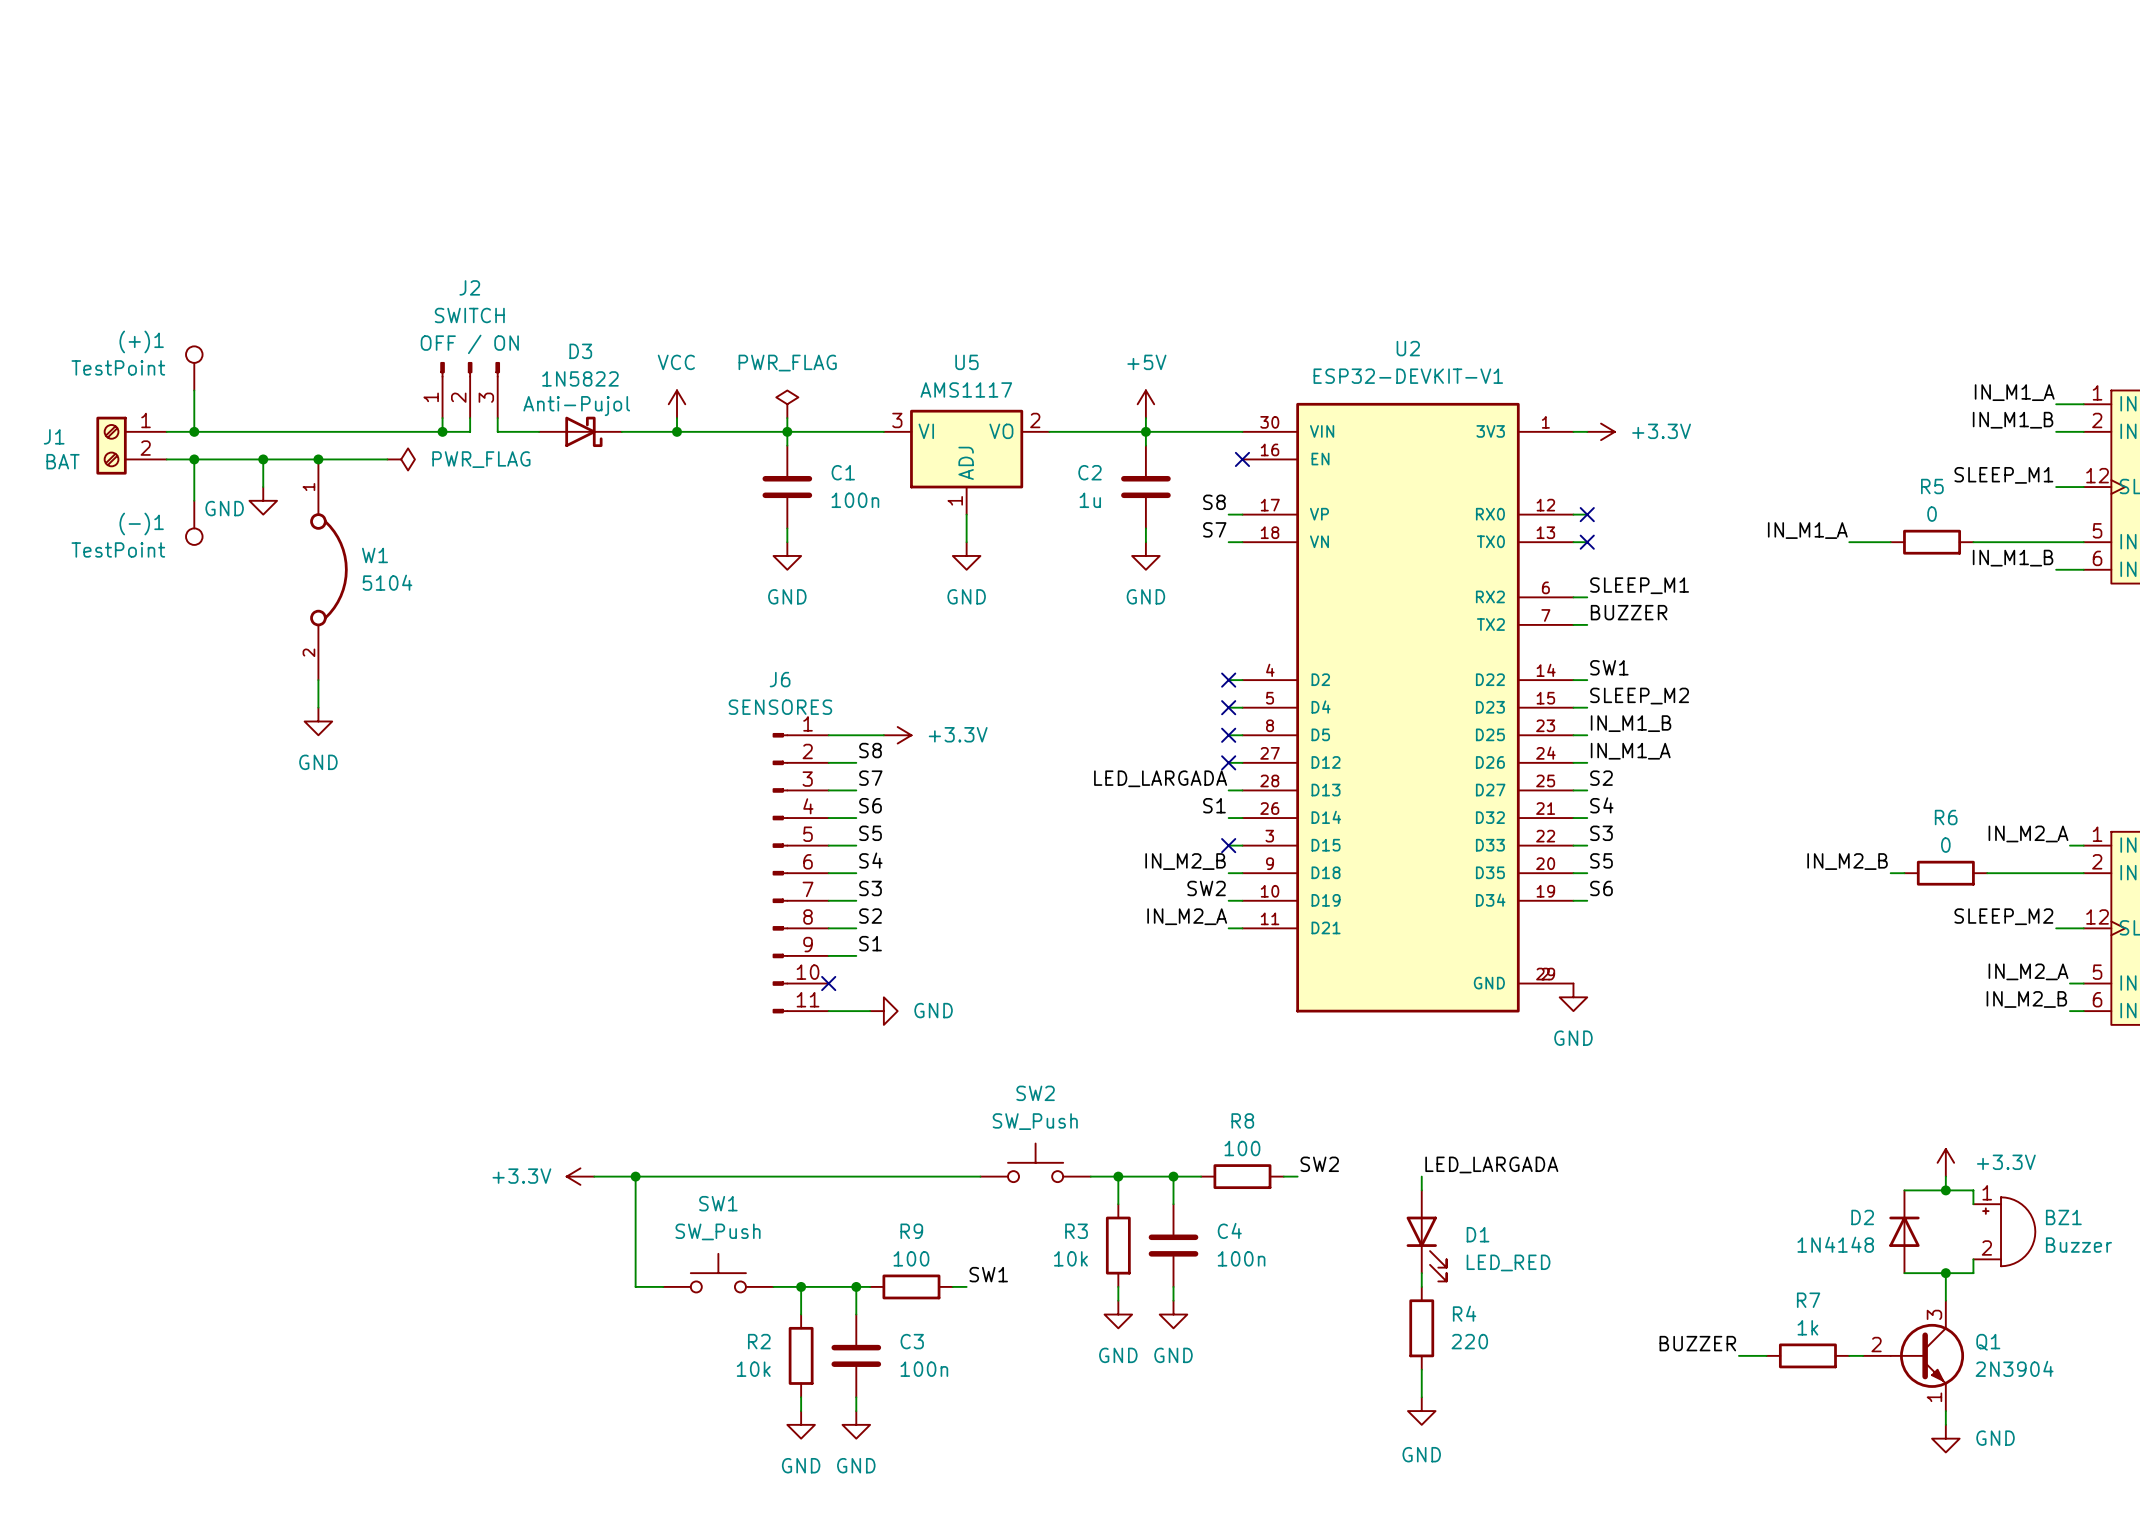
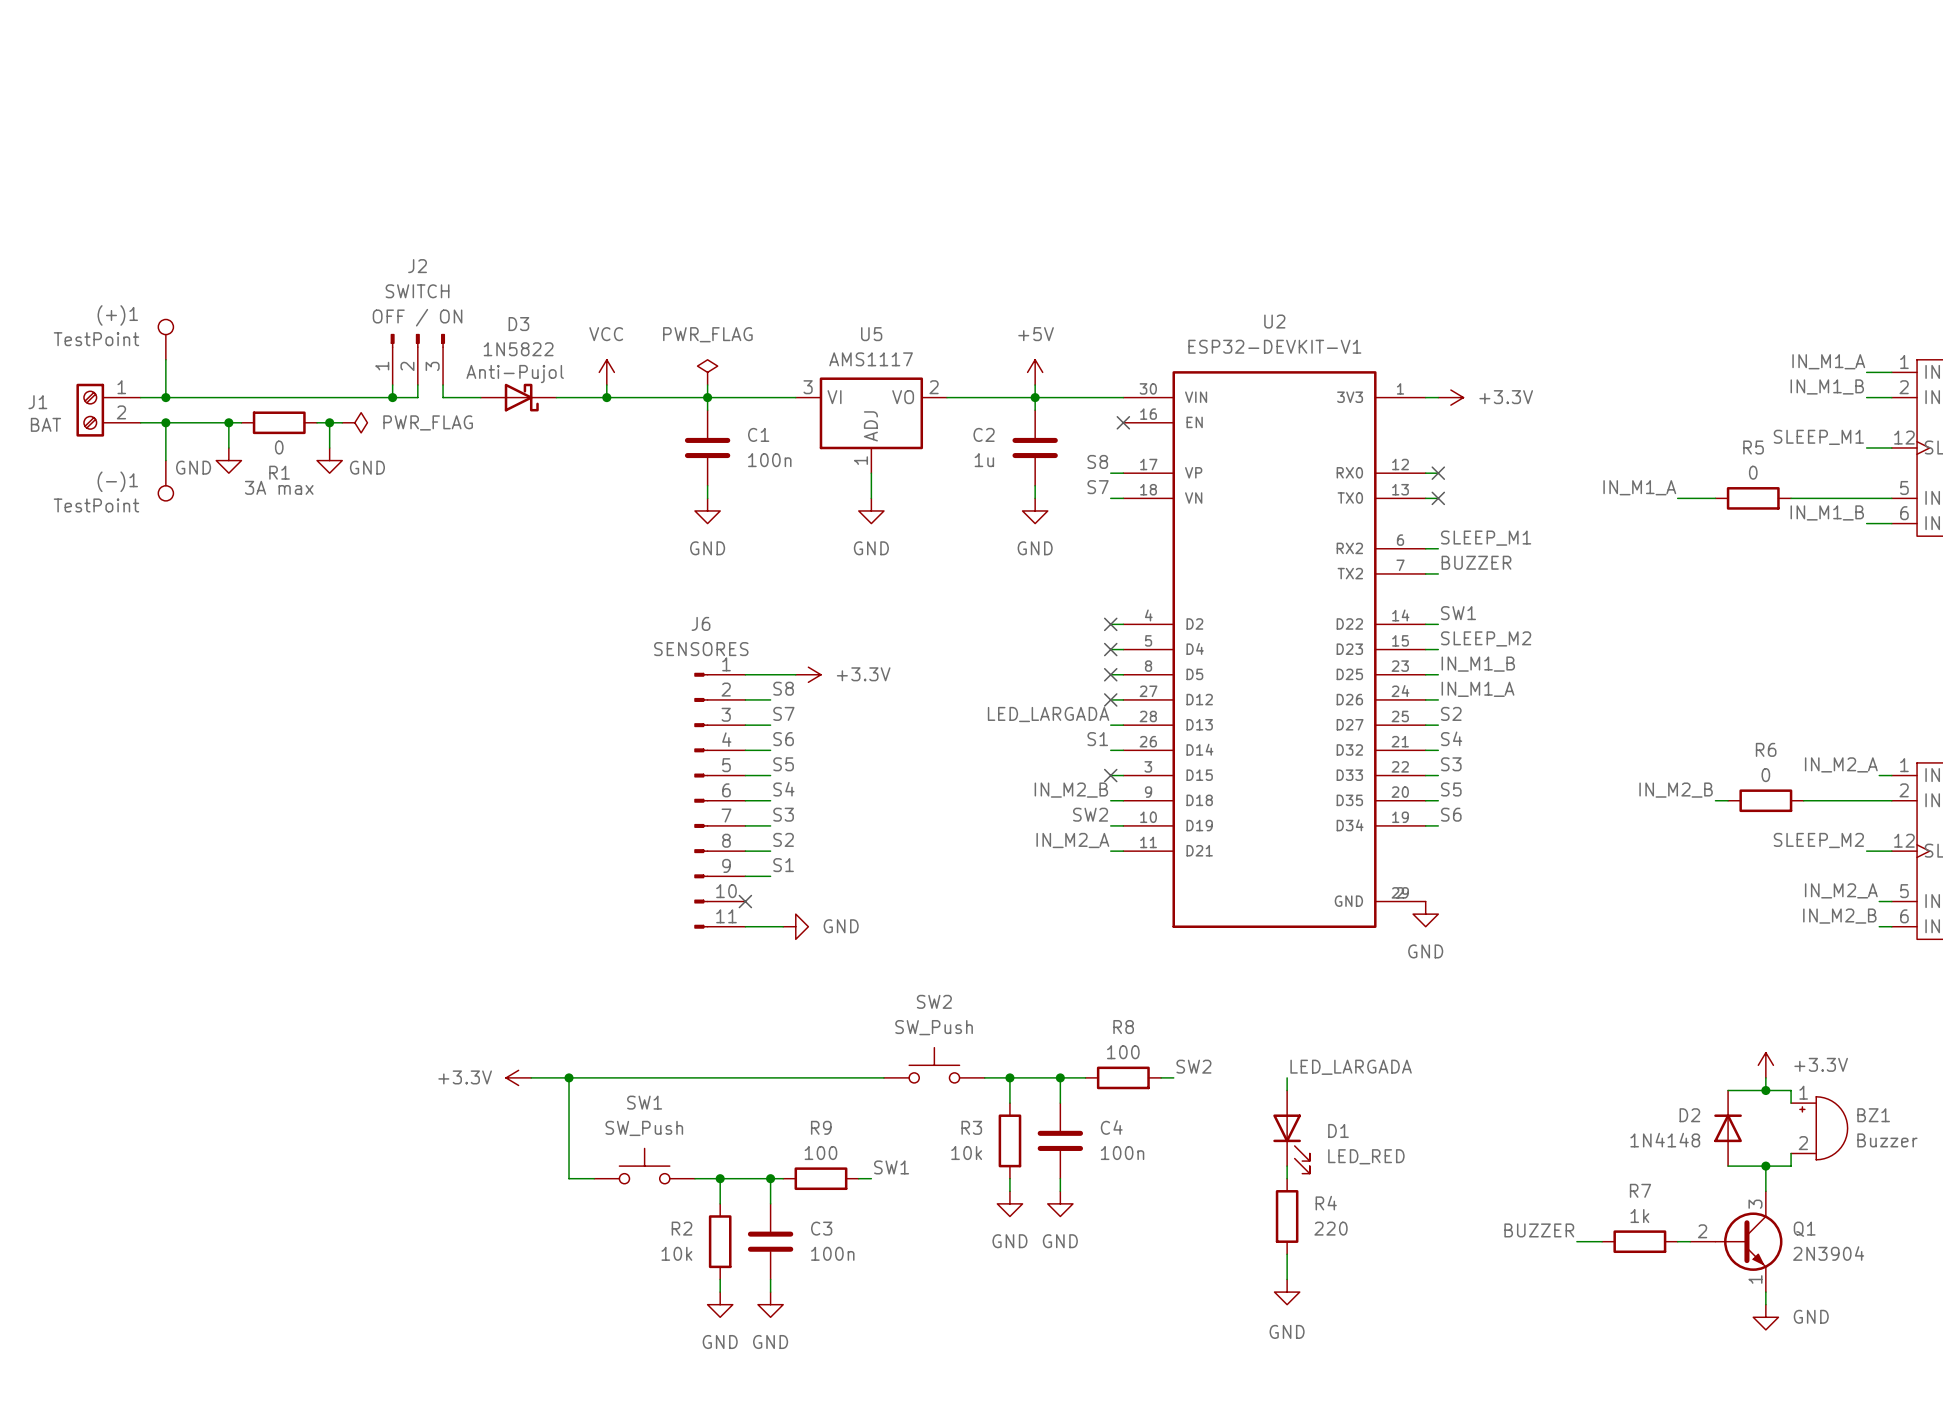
wire: (277, 459) (359, 459) -> none
junction position: (318, 459) -> (329, 422)
R1: none -> 0 (279, 422)
W1: 5104 (328, 569) -> none
wire: (318, 680) (318, 707) -> (329, 422) (329, 447)
power symbol position: GND (318, 721) -> GND (329, 460)
power symbol text position: GND (318, 762) -> GND (367, 467)

